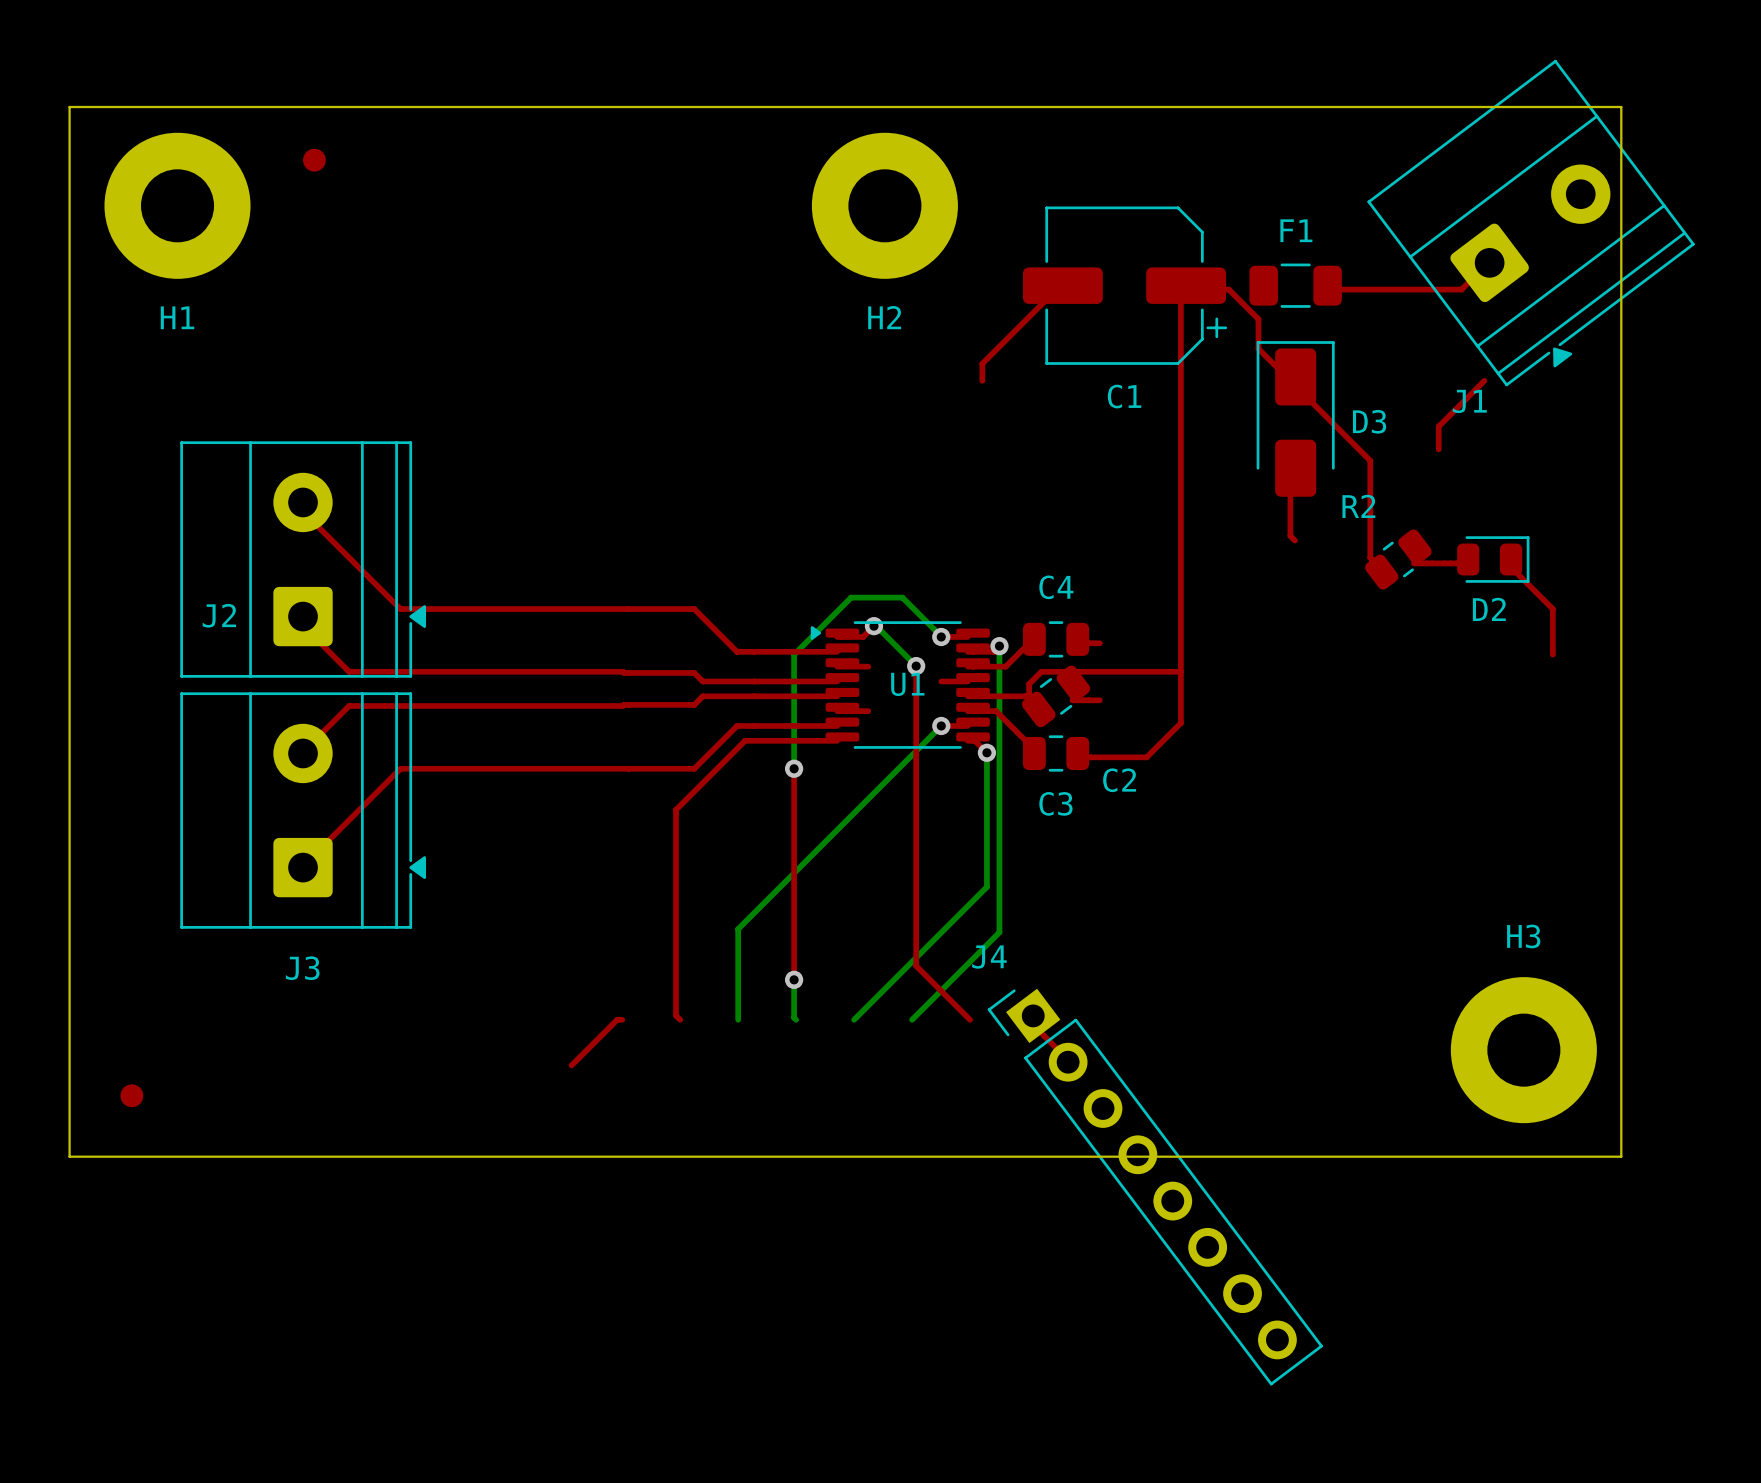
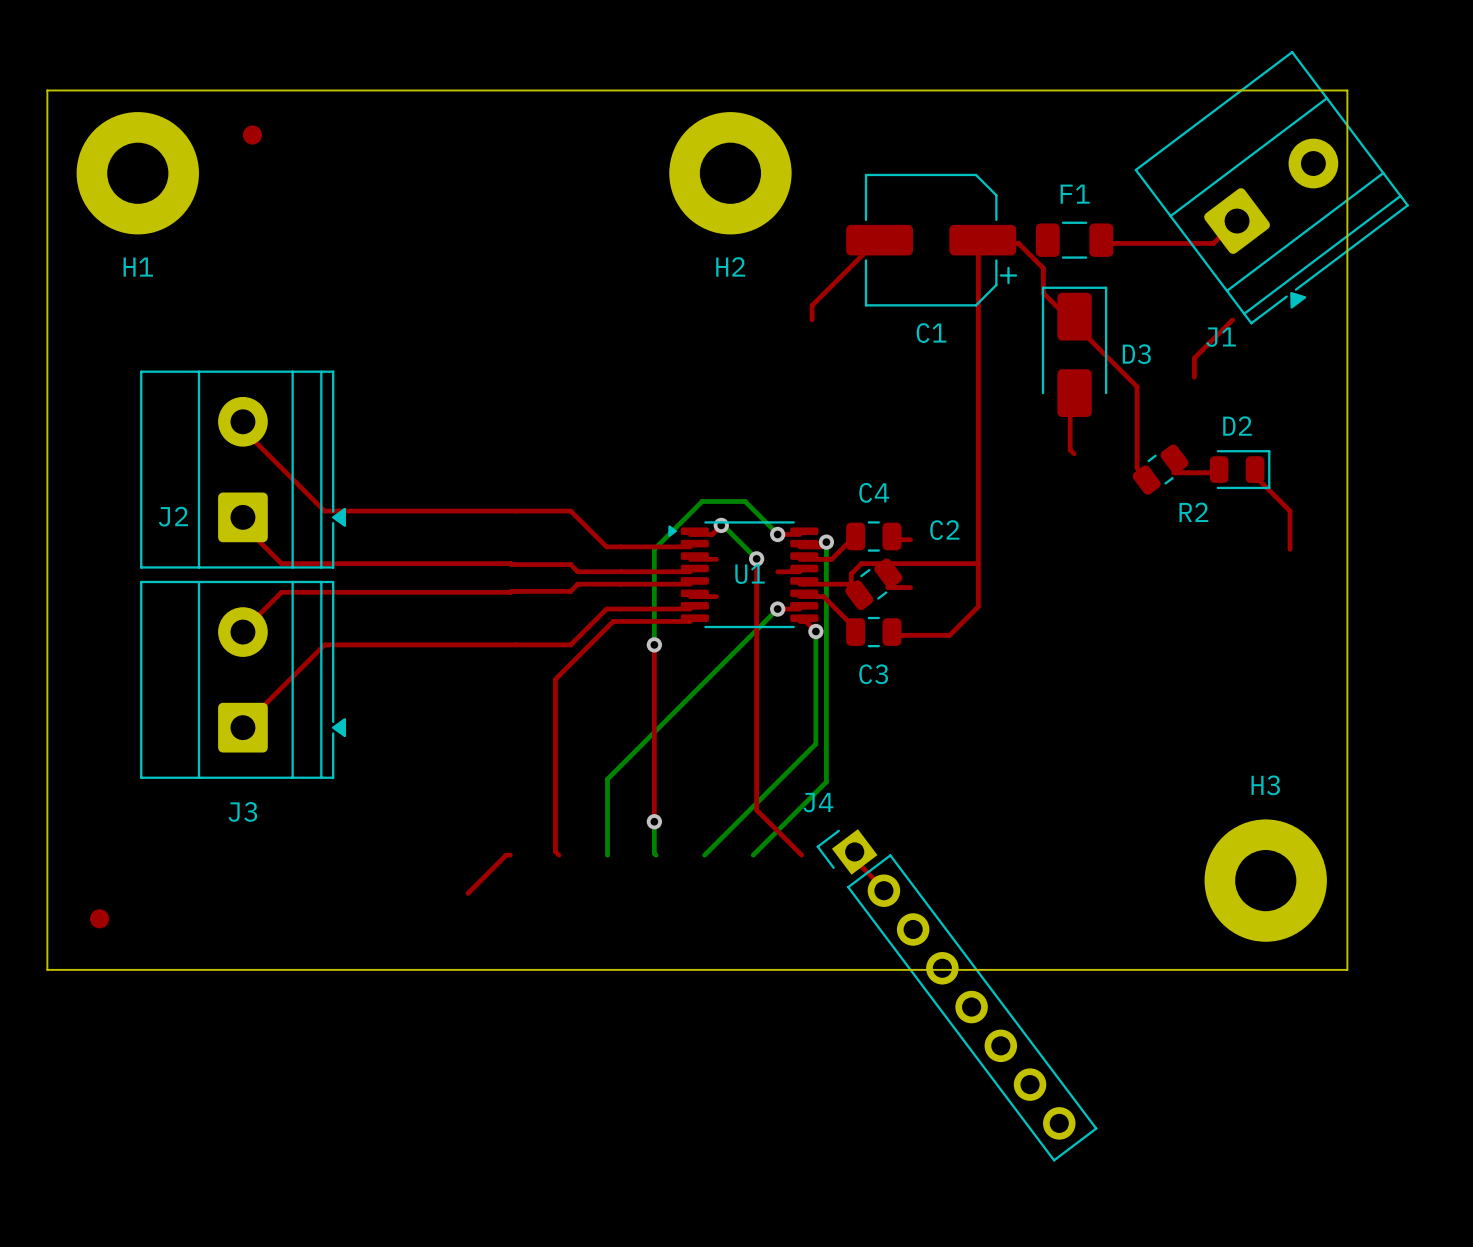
R2 name position: R2 (1358, 506) -> R2 (1193, 512)
D2 name position: D2 (1489, 609) -> D2 (1237, 426)
C2 name position: C2 (1119, 780) -> C2 (944, 530)

